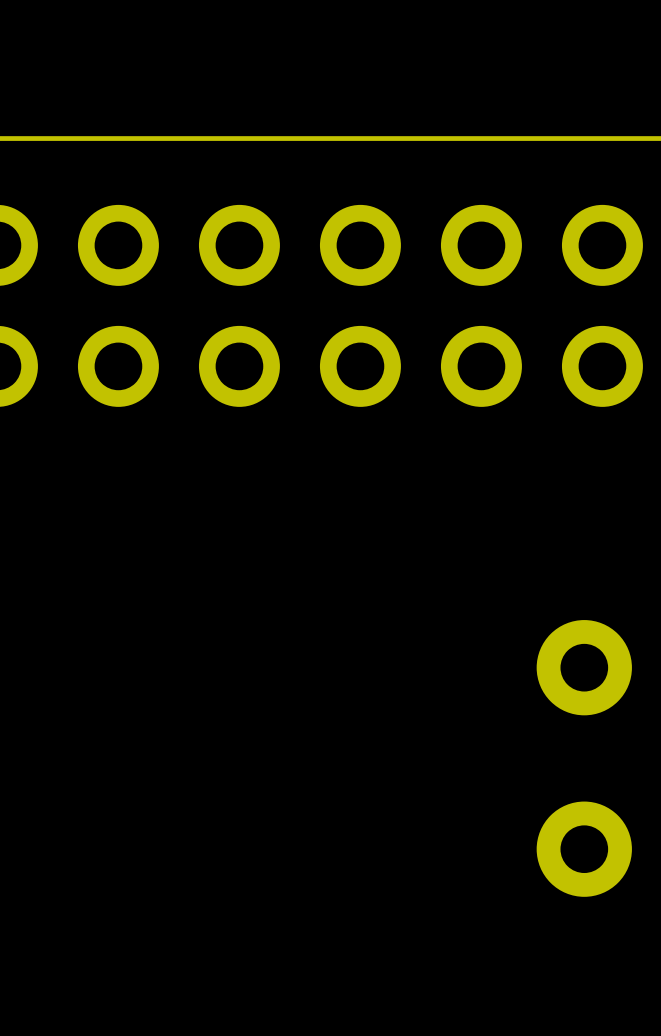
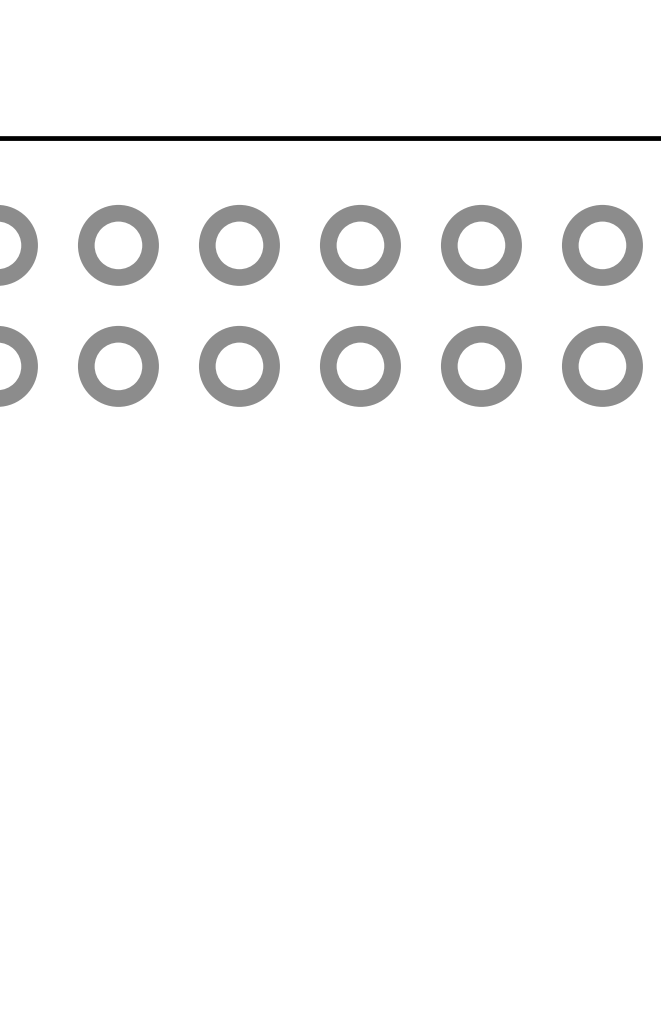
part: (584, 667) -> none
part: (584, 849) -> none

